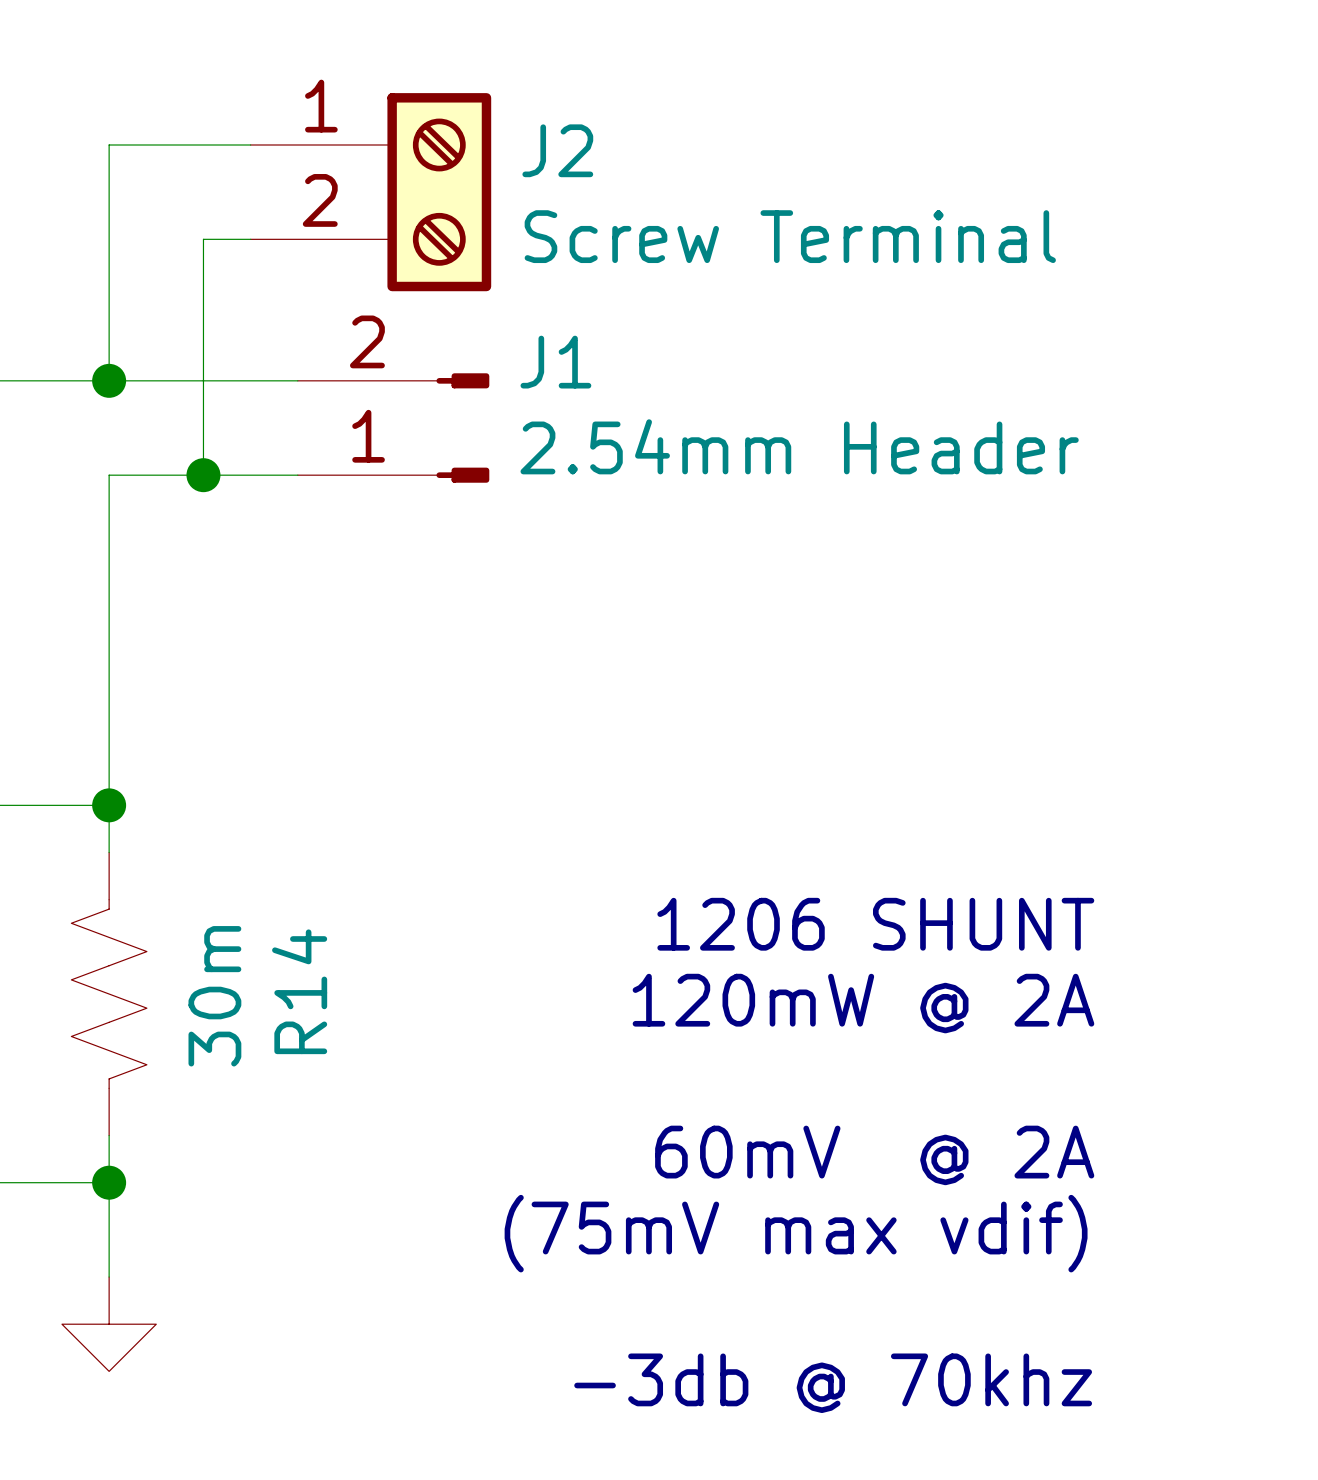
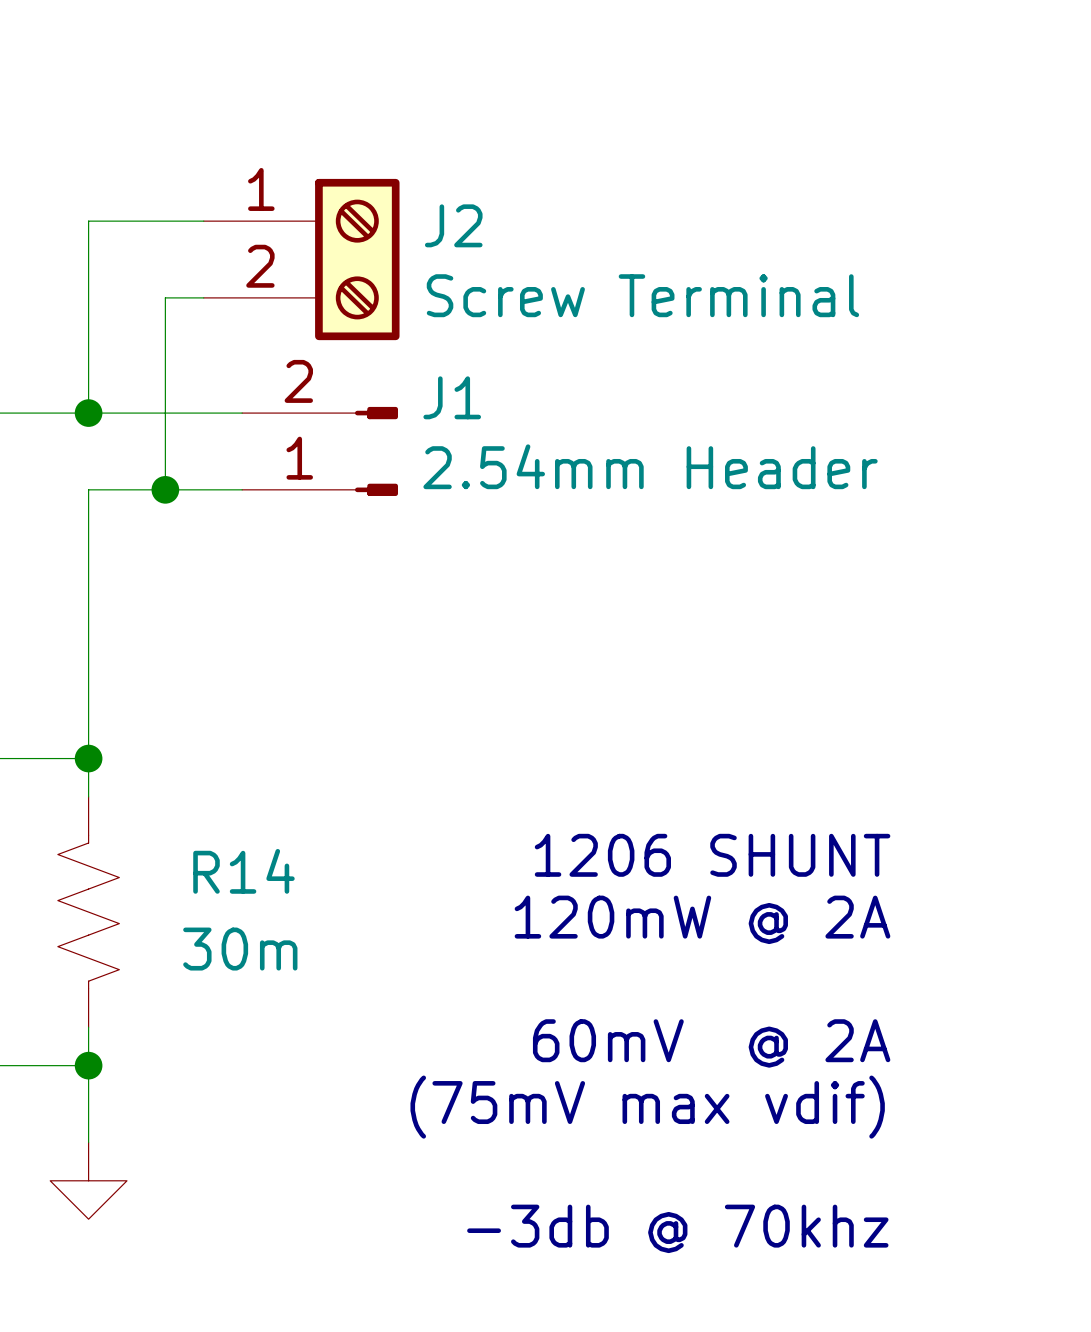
R14 name rotation: 0° (299, 991) -> 90° clockwise (243, 871)
R14 value rotation: 0° (214, 996) -> 90° clockwise (240, 949)

